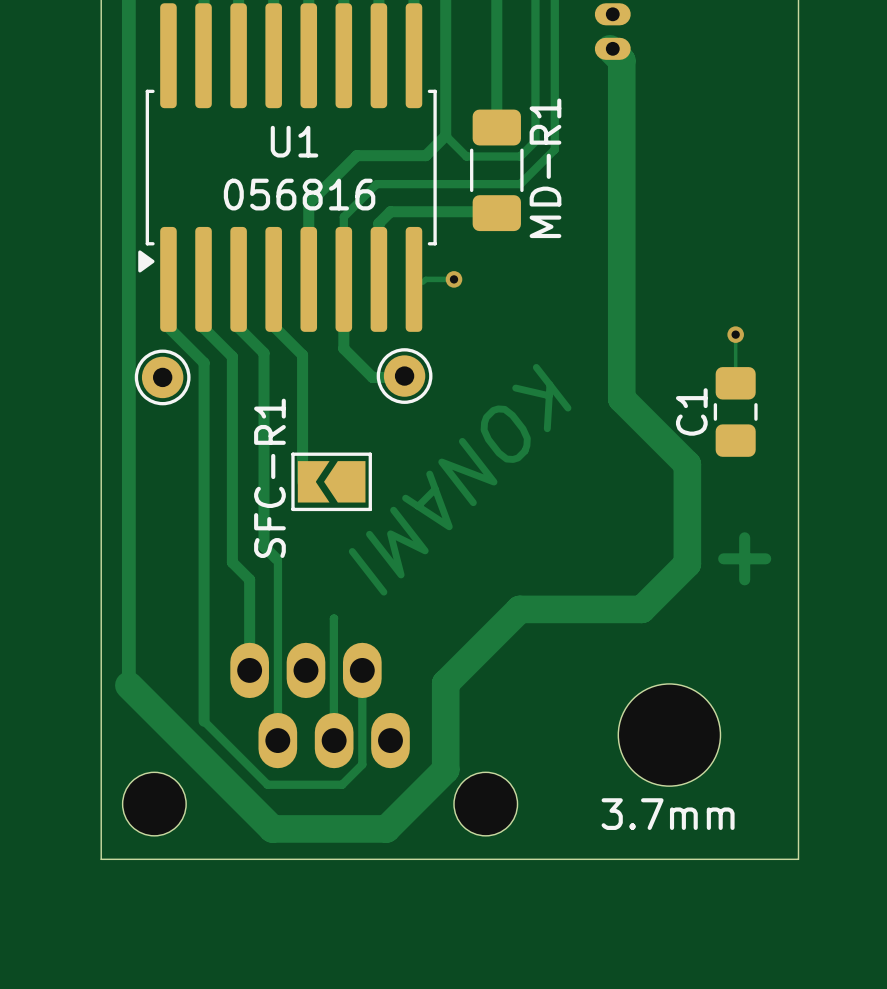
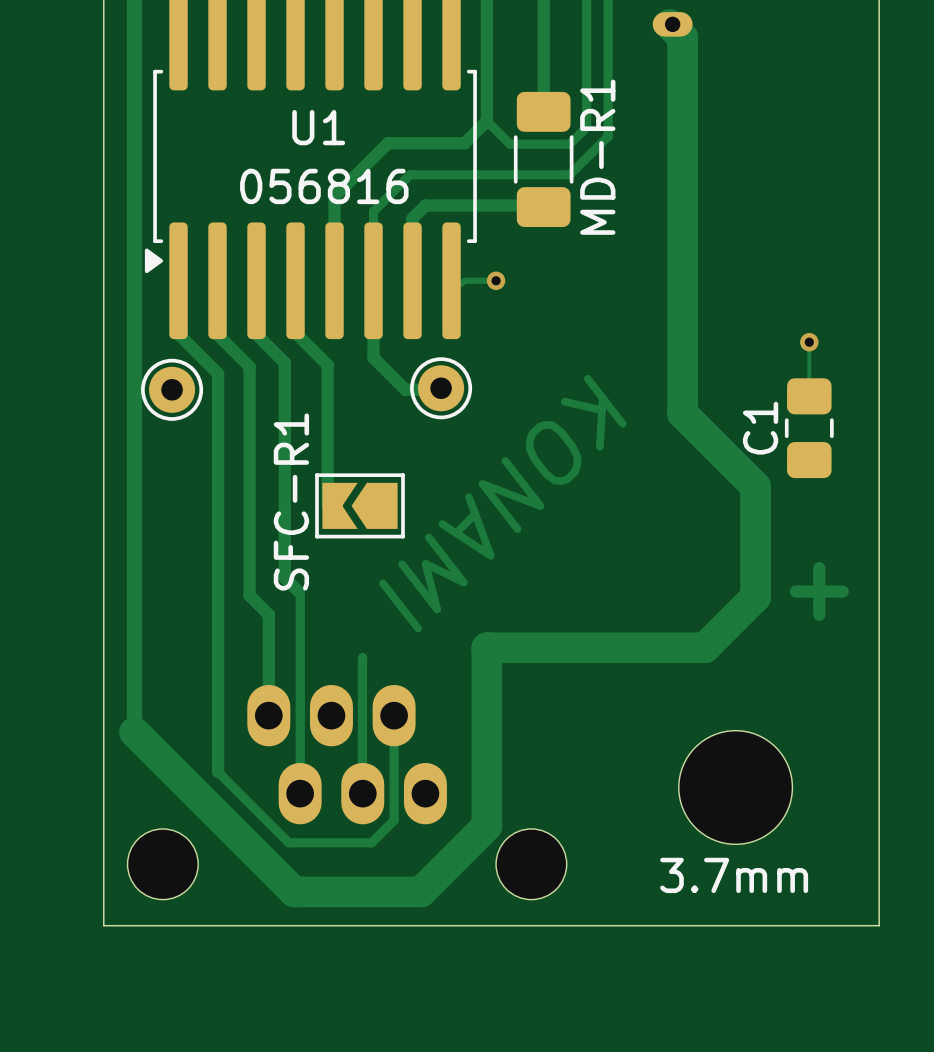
track: (519, 609) (445, 683) -> (569, 647) (486, 647) (486, 730)

